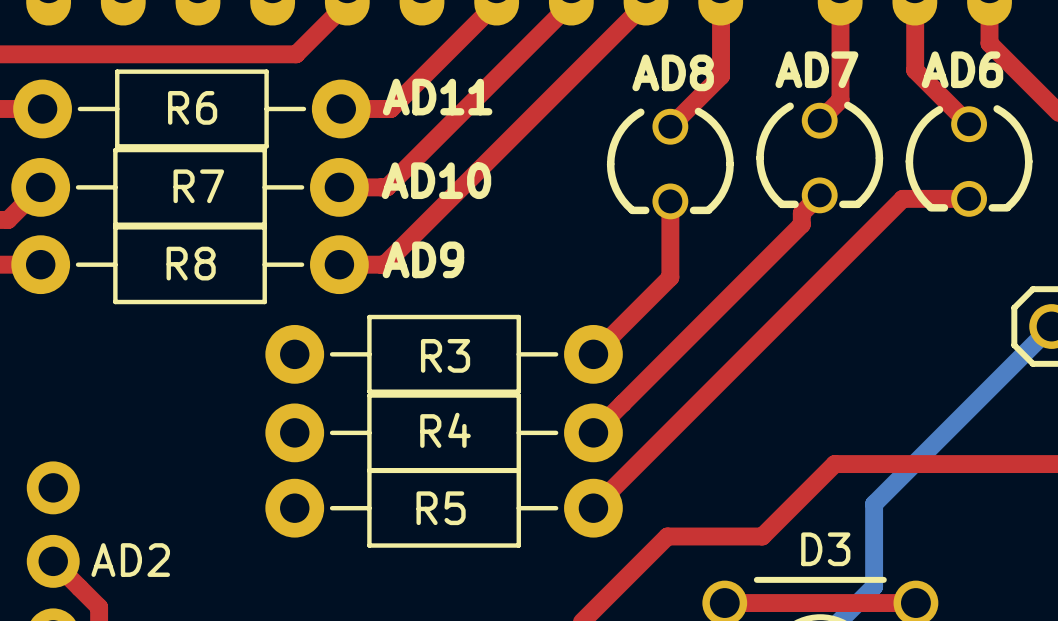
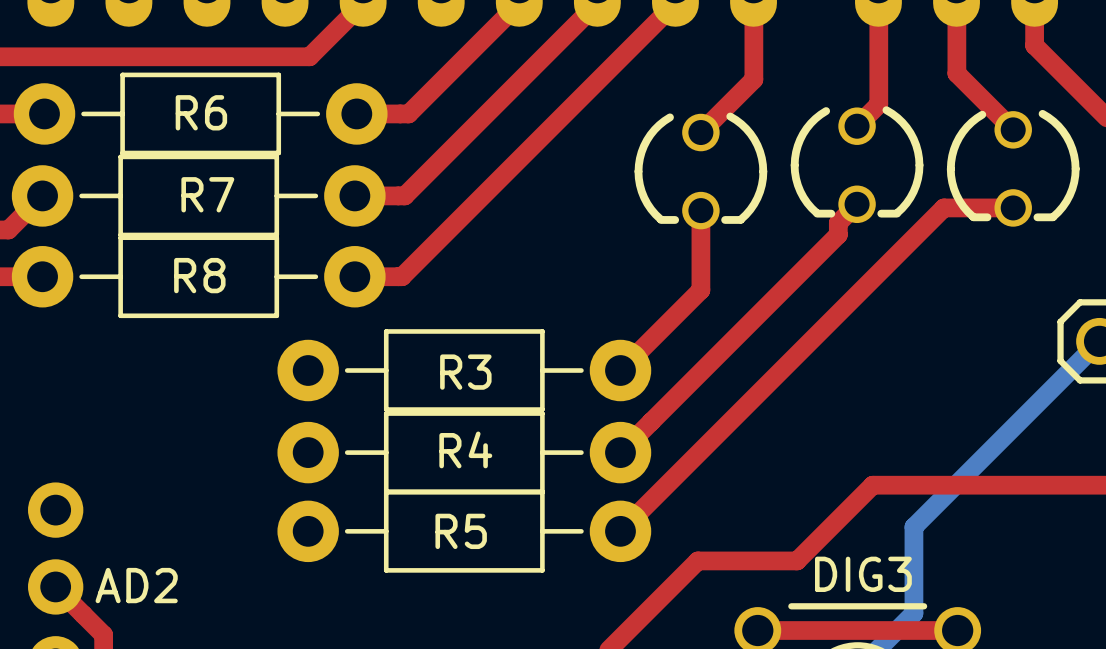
text: AD7 (816, 69) -> none
text: AD6 (962, 69) -> none
text: AD8 (673, 72) -> none
text: AD11 (437, 97) -> none
text: AD10 (436, 180) -> none
text: AD9 (423, 259) -> none
text: D3 (825, 549) -> DIG3 (863, 574)

